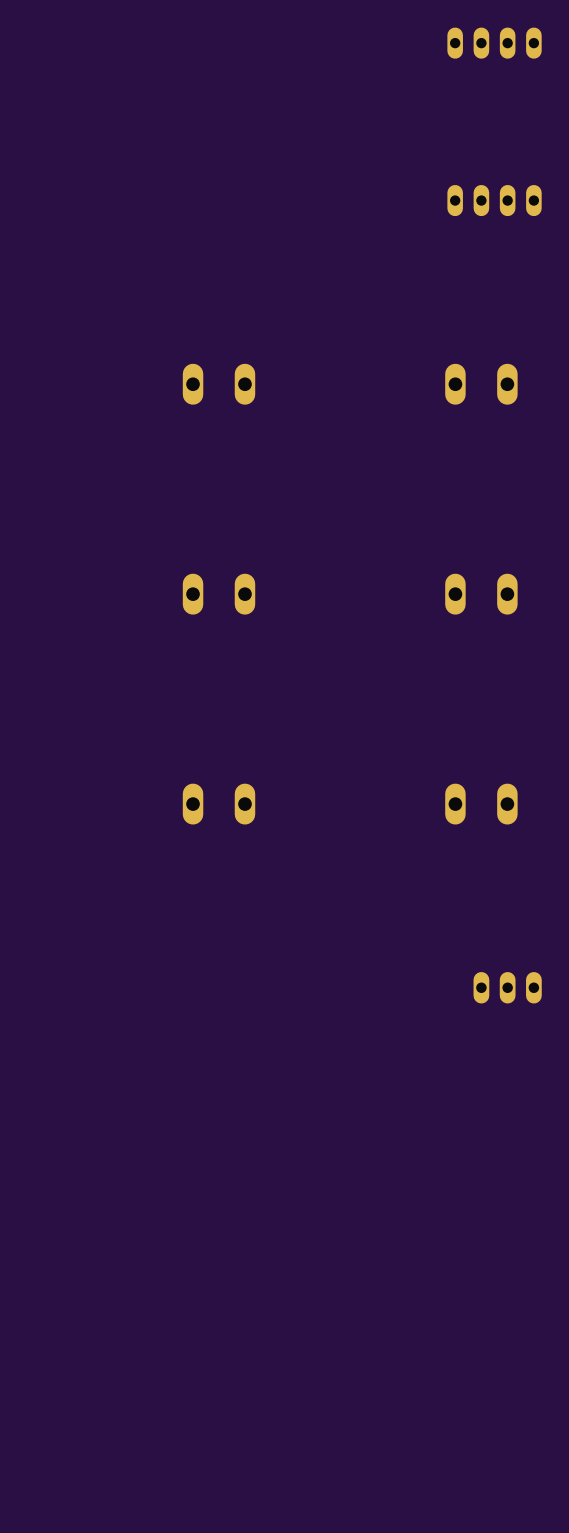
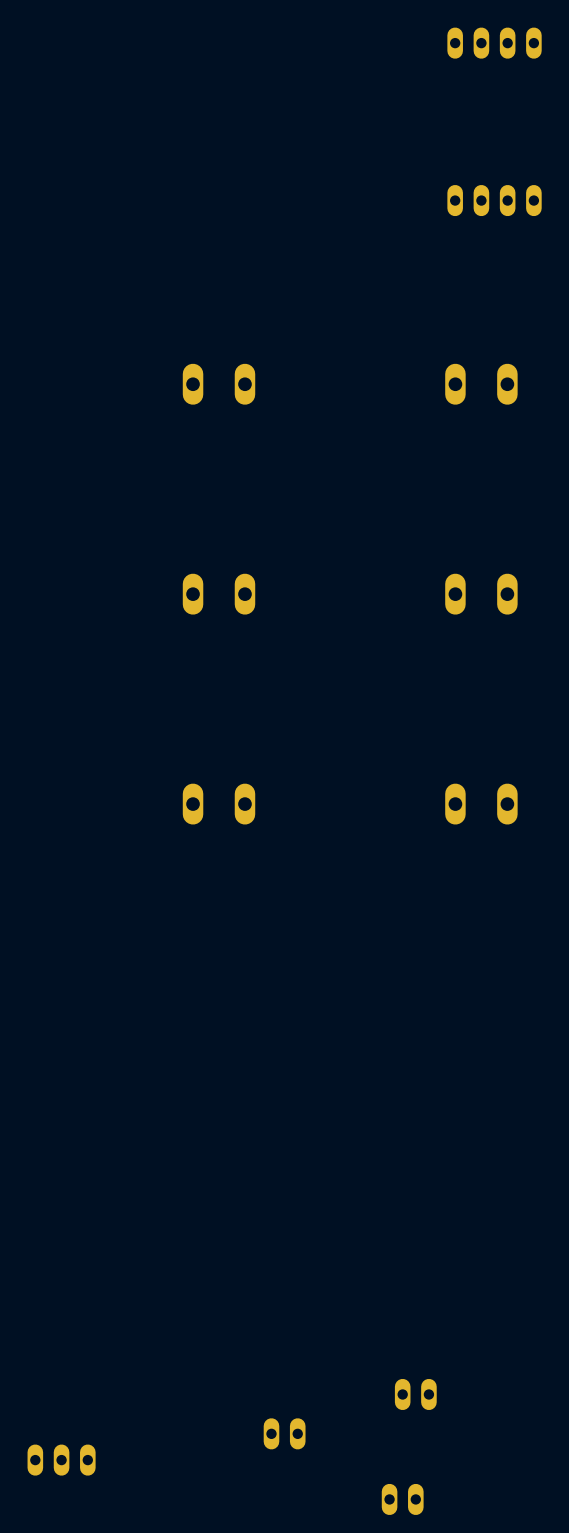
part: (507, 987) -> none
part: none -> (415, 1394)
part: none -> (284, 1433)
part: none -> (61, 1460)
part: none -> (402, 1499)

